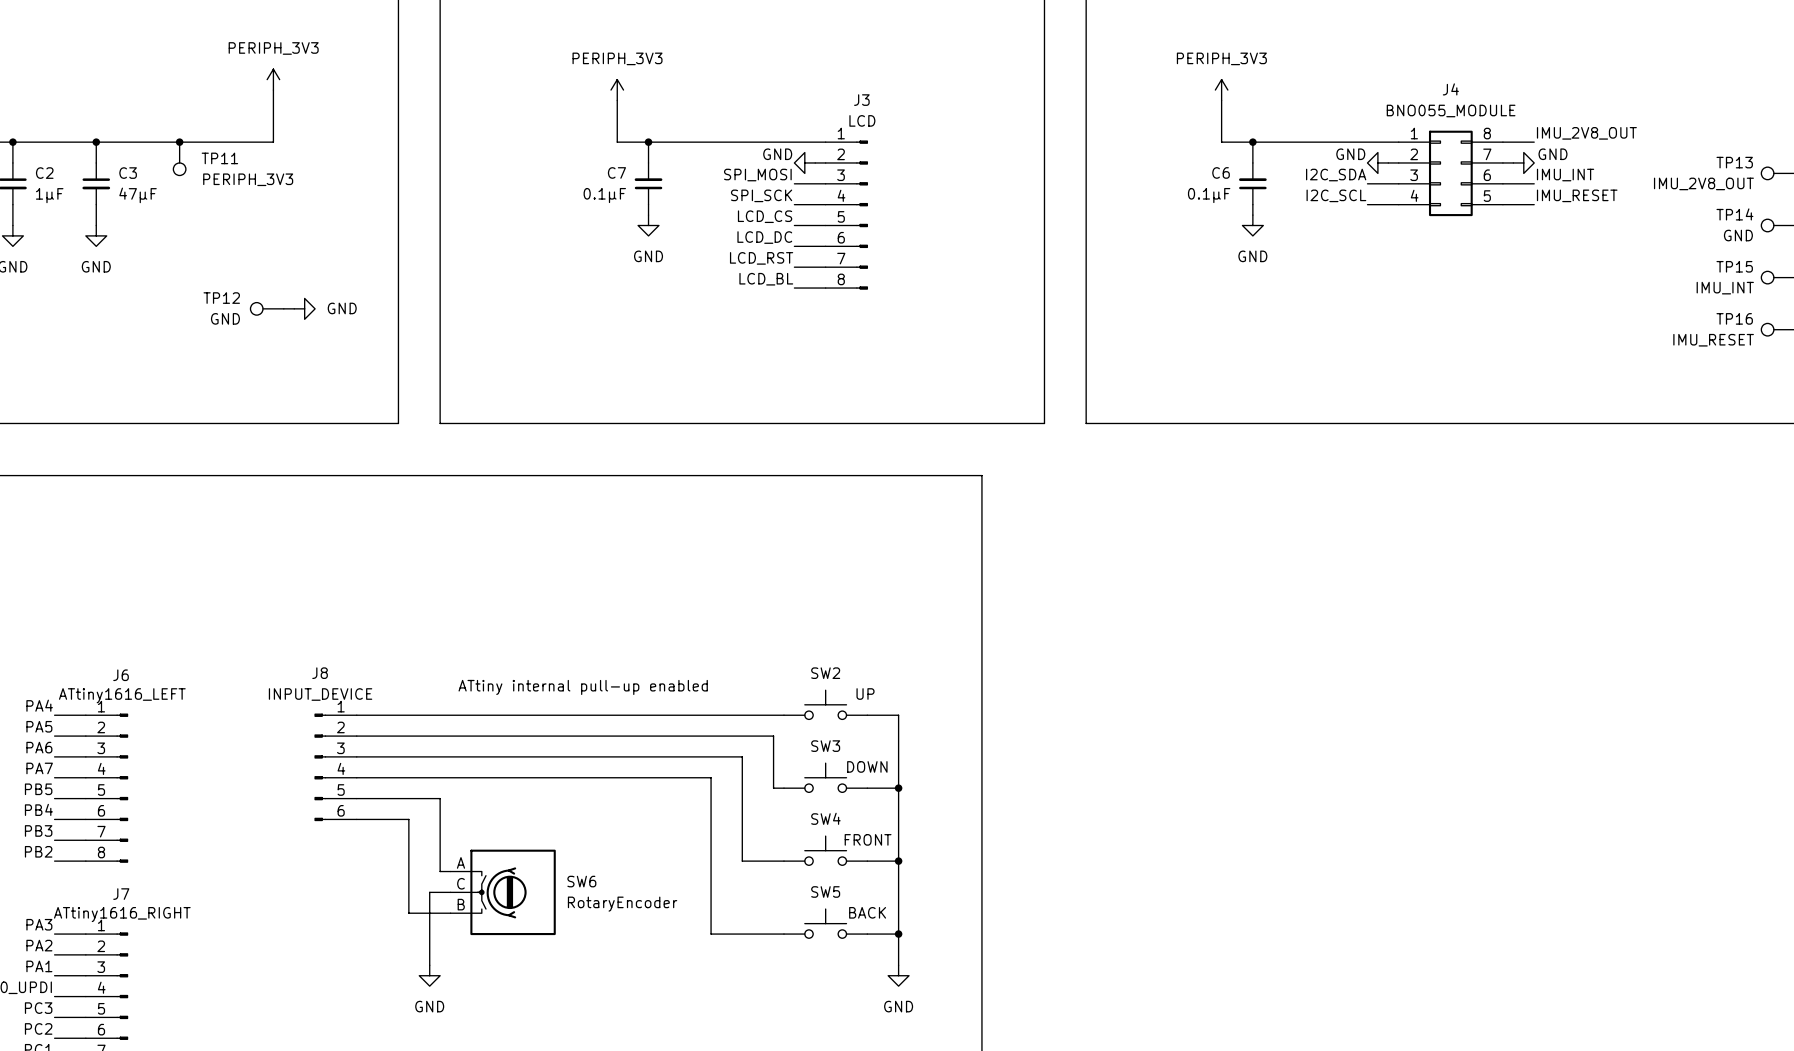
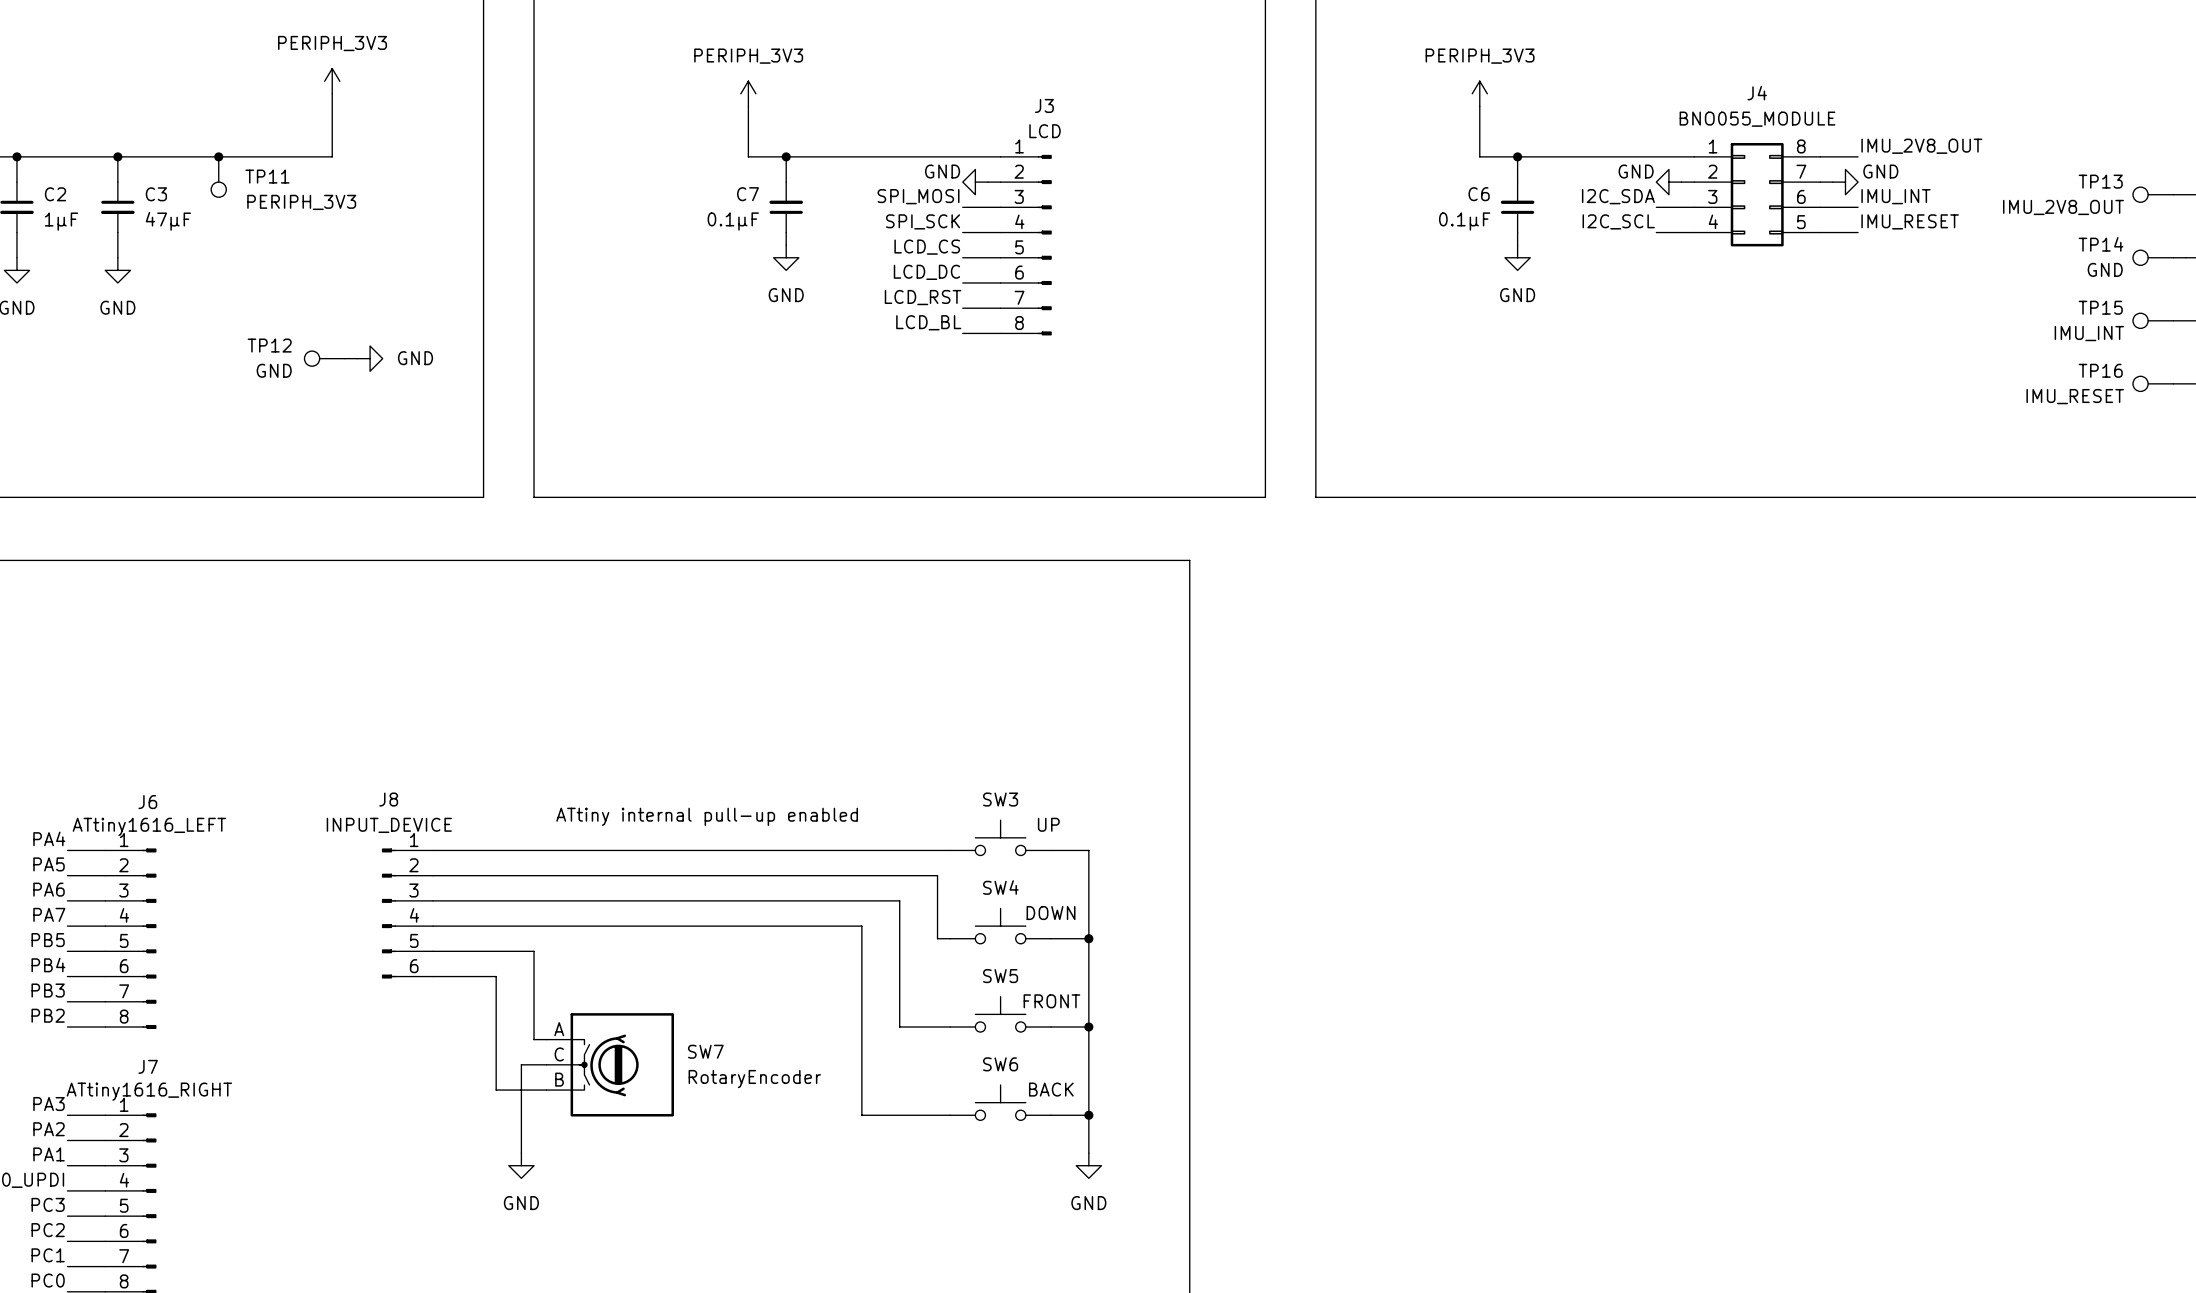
SW2 name: SW2 (825, 673) -> SW3 (1000, 799)
SW3 name: SW3 (825, 746) -> SW4 (1000, 887)
SW4 name: SW4 (825, 818) -> SW5 (1000, 976)
SW6 name: SW6 (581, 881) -> SW7 (705, 1051)
SW5 name: SW5 (825, 891) -> SW6 (1000, 1064)

